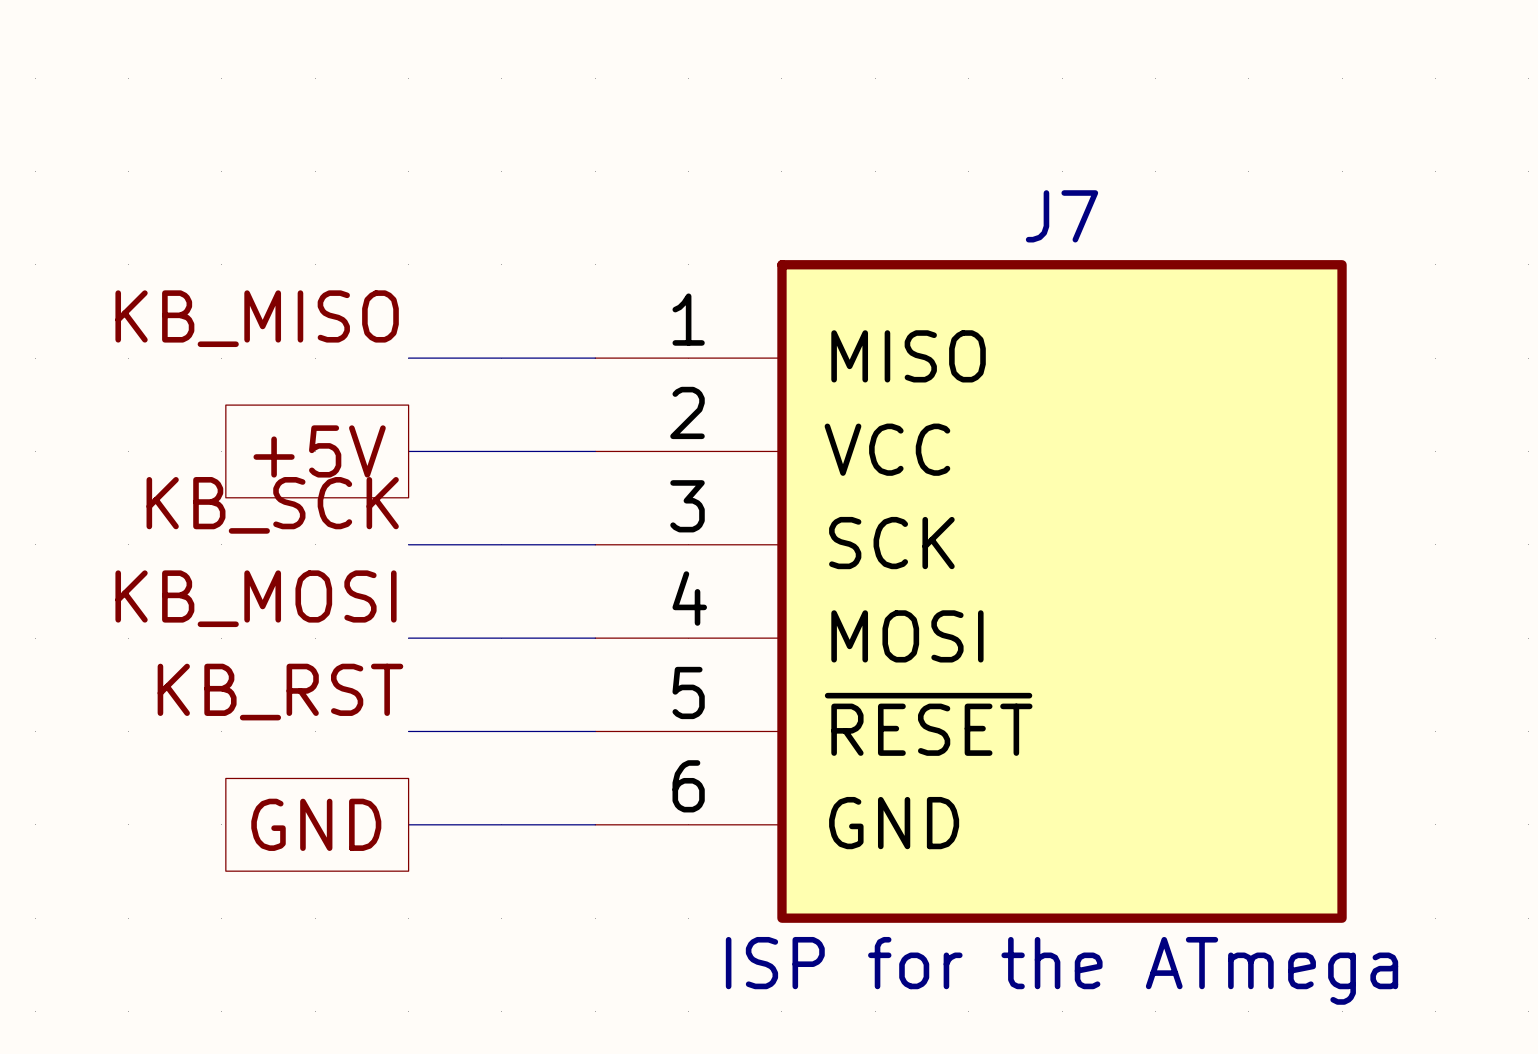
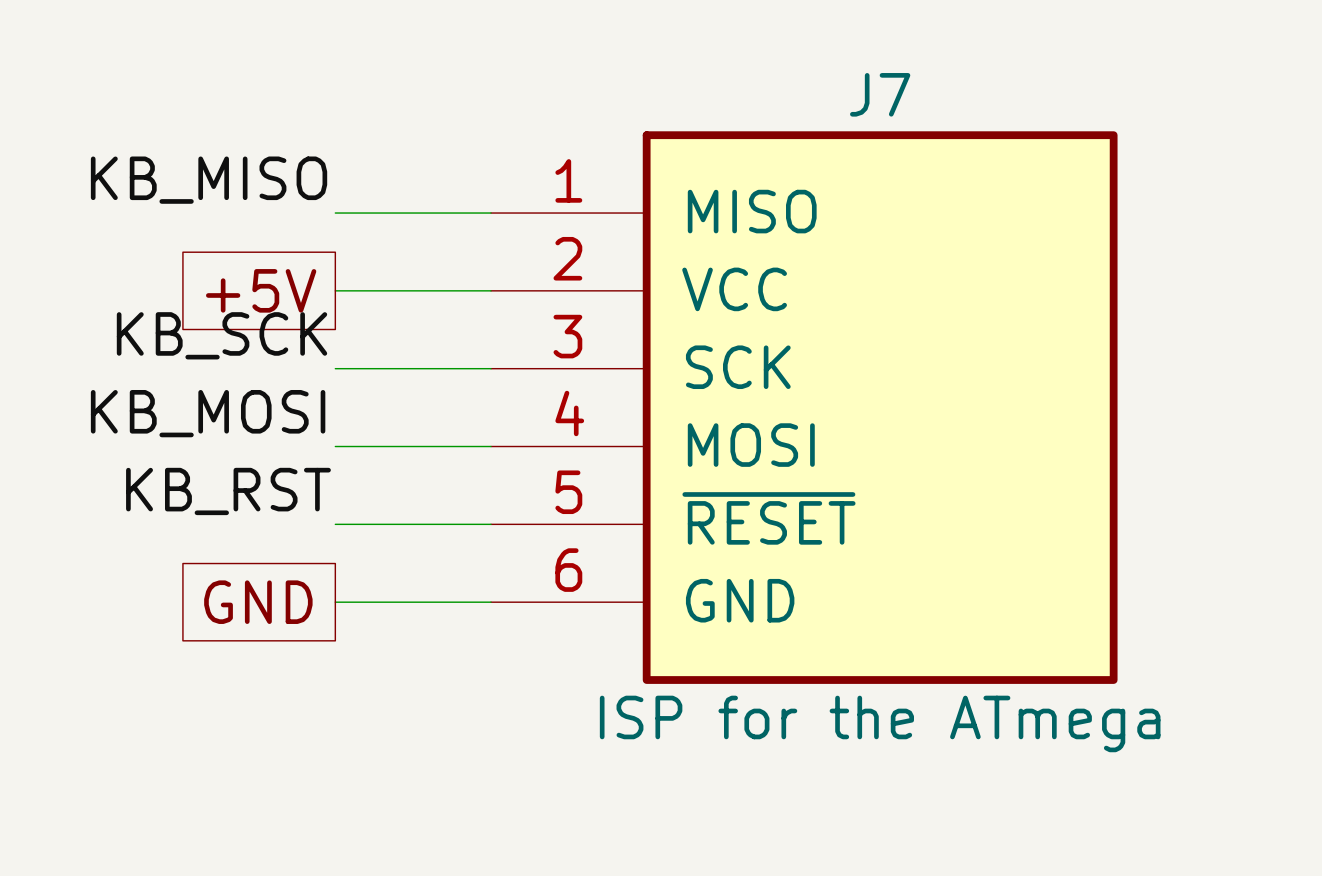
label position: KB_MISO (257, 318) -> KB_MISO (209, 180)
label: none -> KB_SCK (221, 335)
global label position: +5V (319, 451) -> +5V (261, 290)
label: KB_SCK (272, 505) -> KB_MOSI (208, 413)
J7 position: (970, 591) -> (804, 407)
label: KB_MOSI (256, 598) -> KB_RST (228, 491)
label: KB_RST (280, 692) -> none
global label position: GND (316, 824) -> GND (258, 602)
wire: (408, 824) (595, 824) -> (335, 213) (490, 213)

